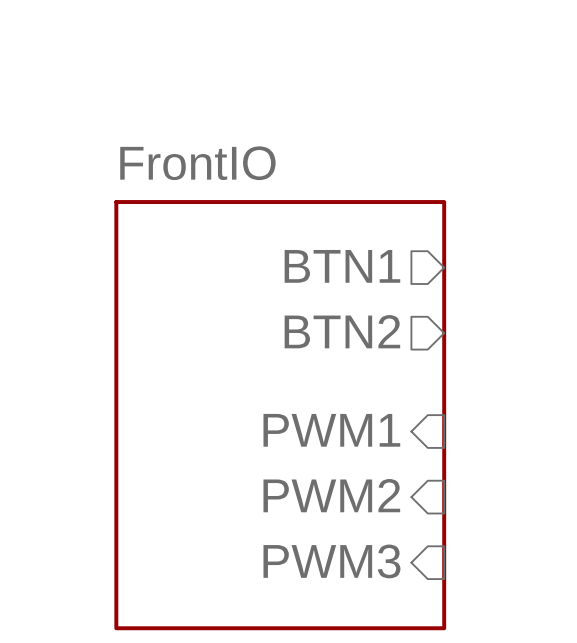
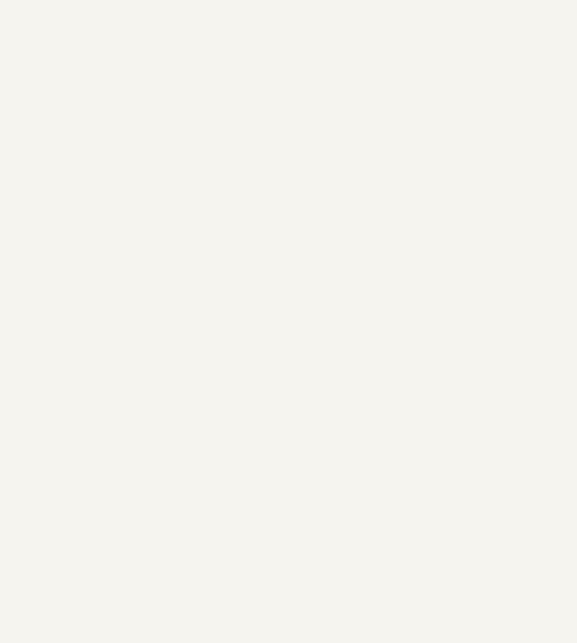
sheet pin: BTN1 (342, 266) -> none
sheet pin: BTN2 (342, 331) -> none
sheet FrontIO: (280, 415) -> none
sheet pin: PWM1 (331, 430) -> none
sheet pin: PWM2 (331, 495) -> none
sheet pin: PWM3 (331, 561) -> none

